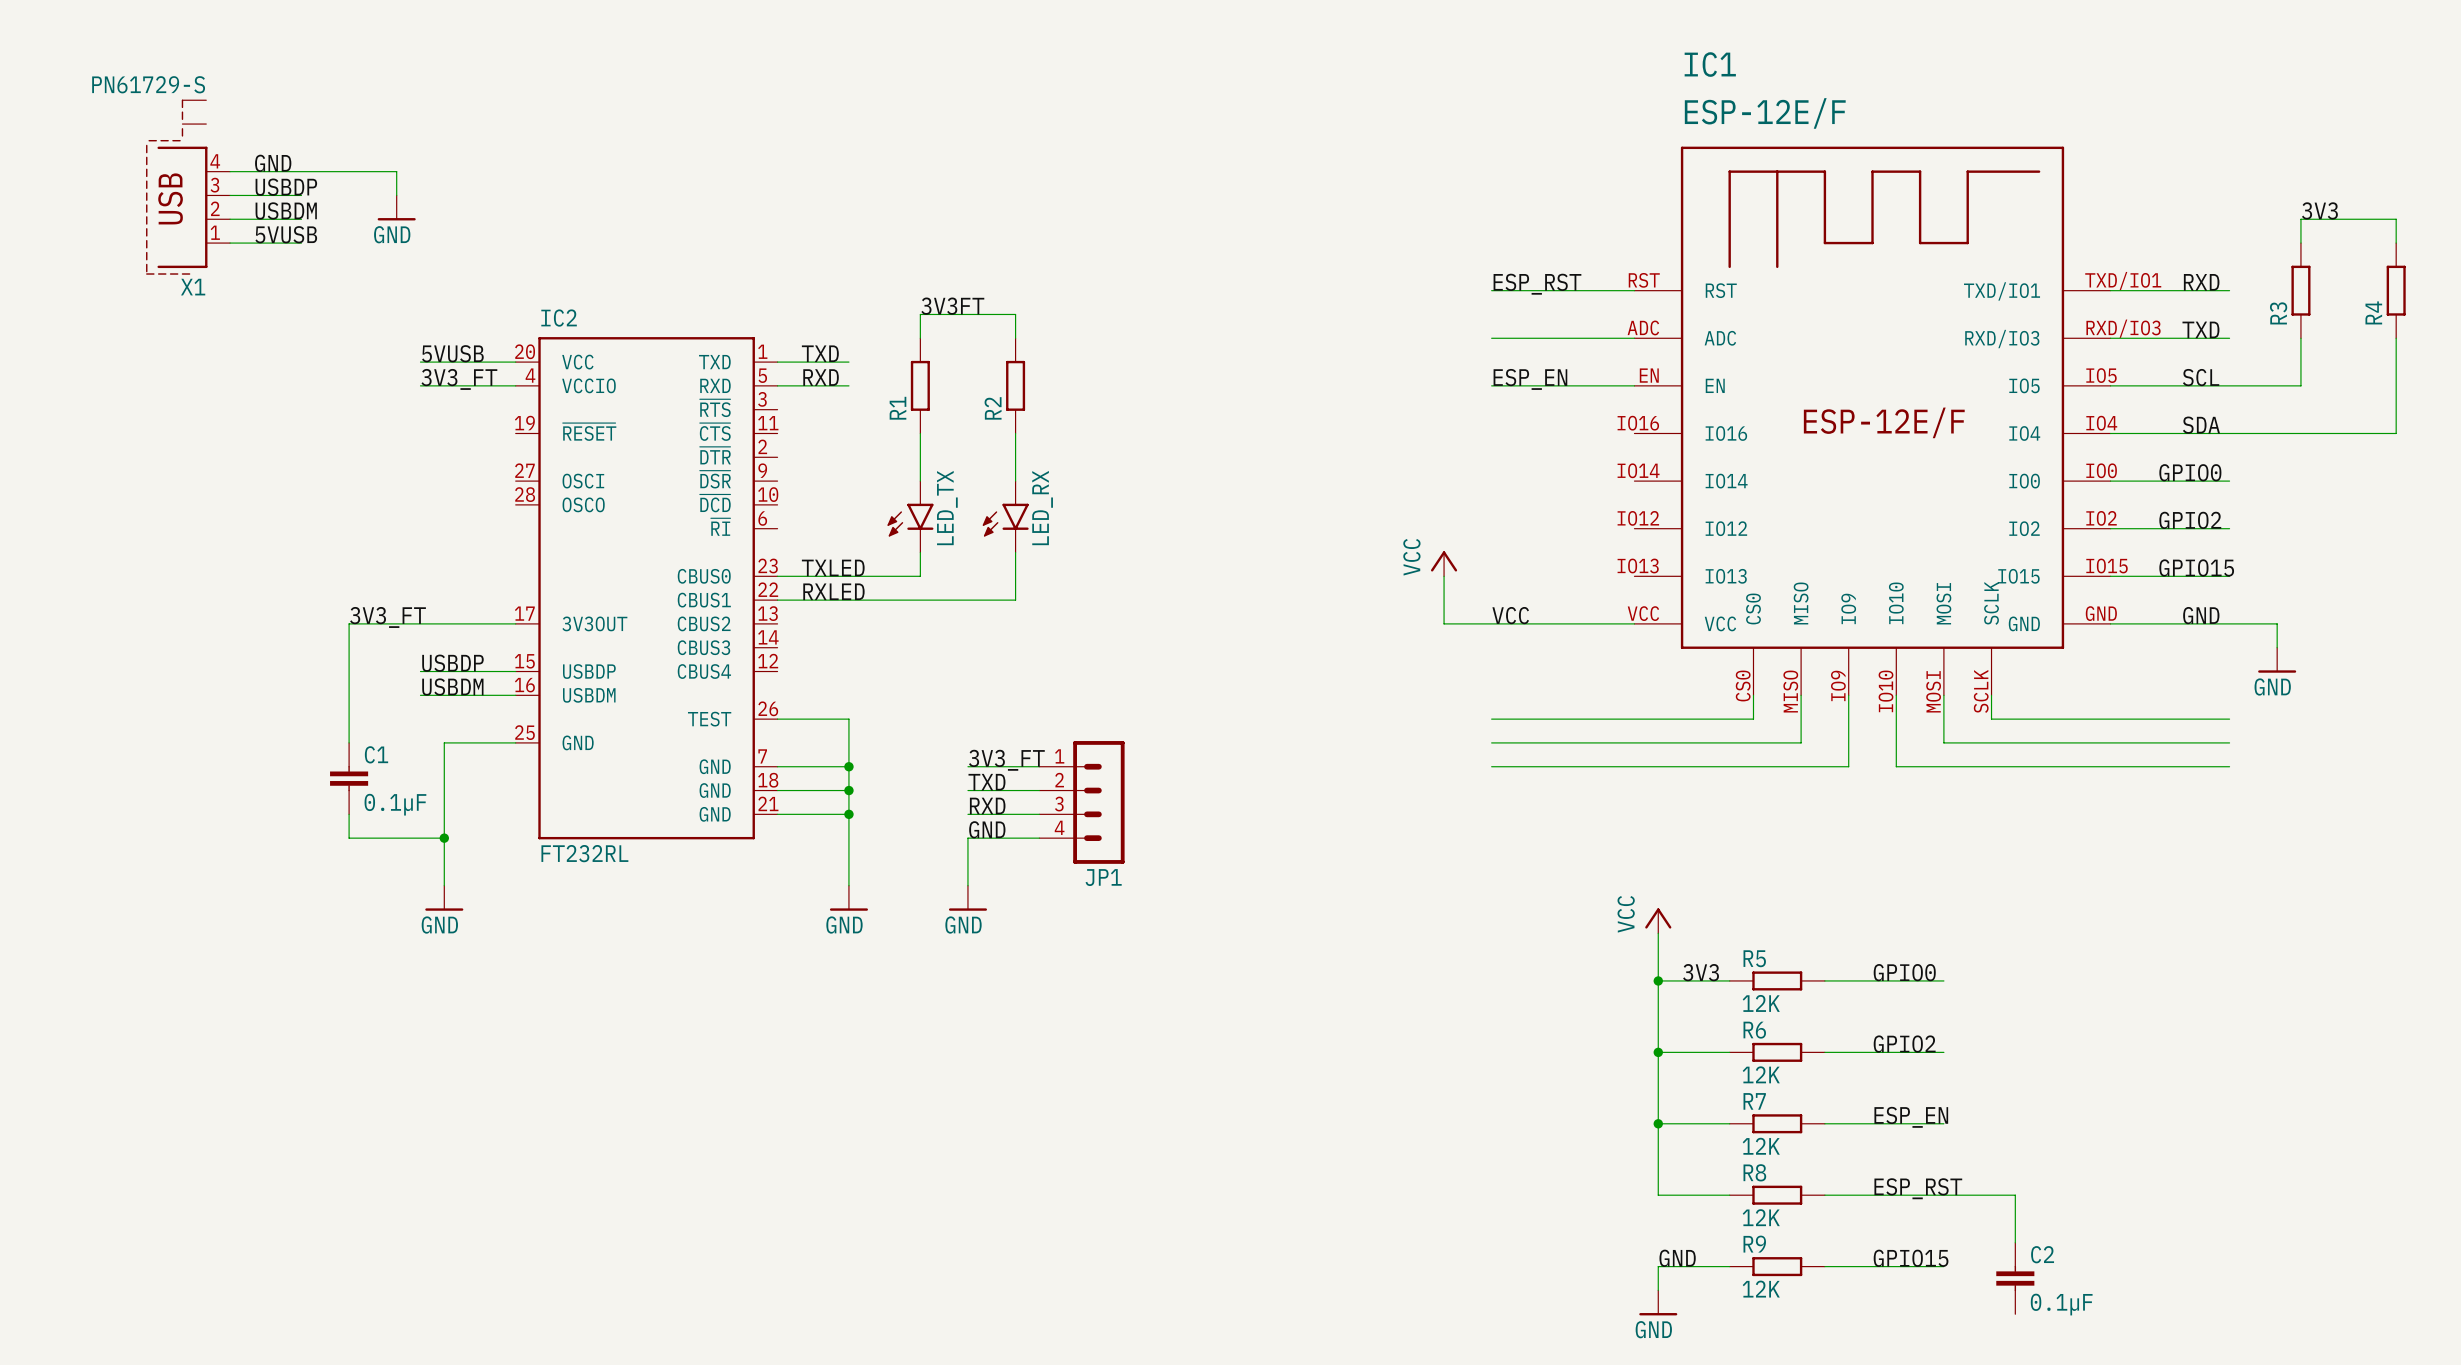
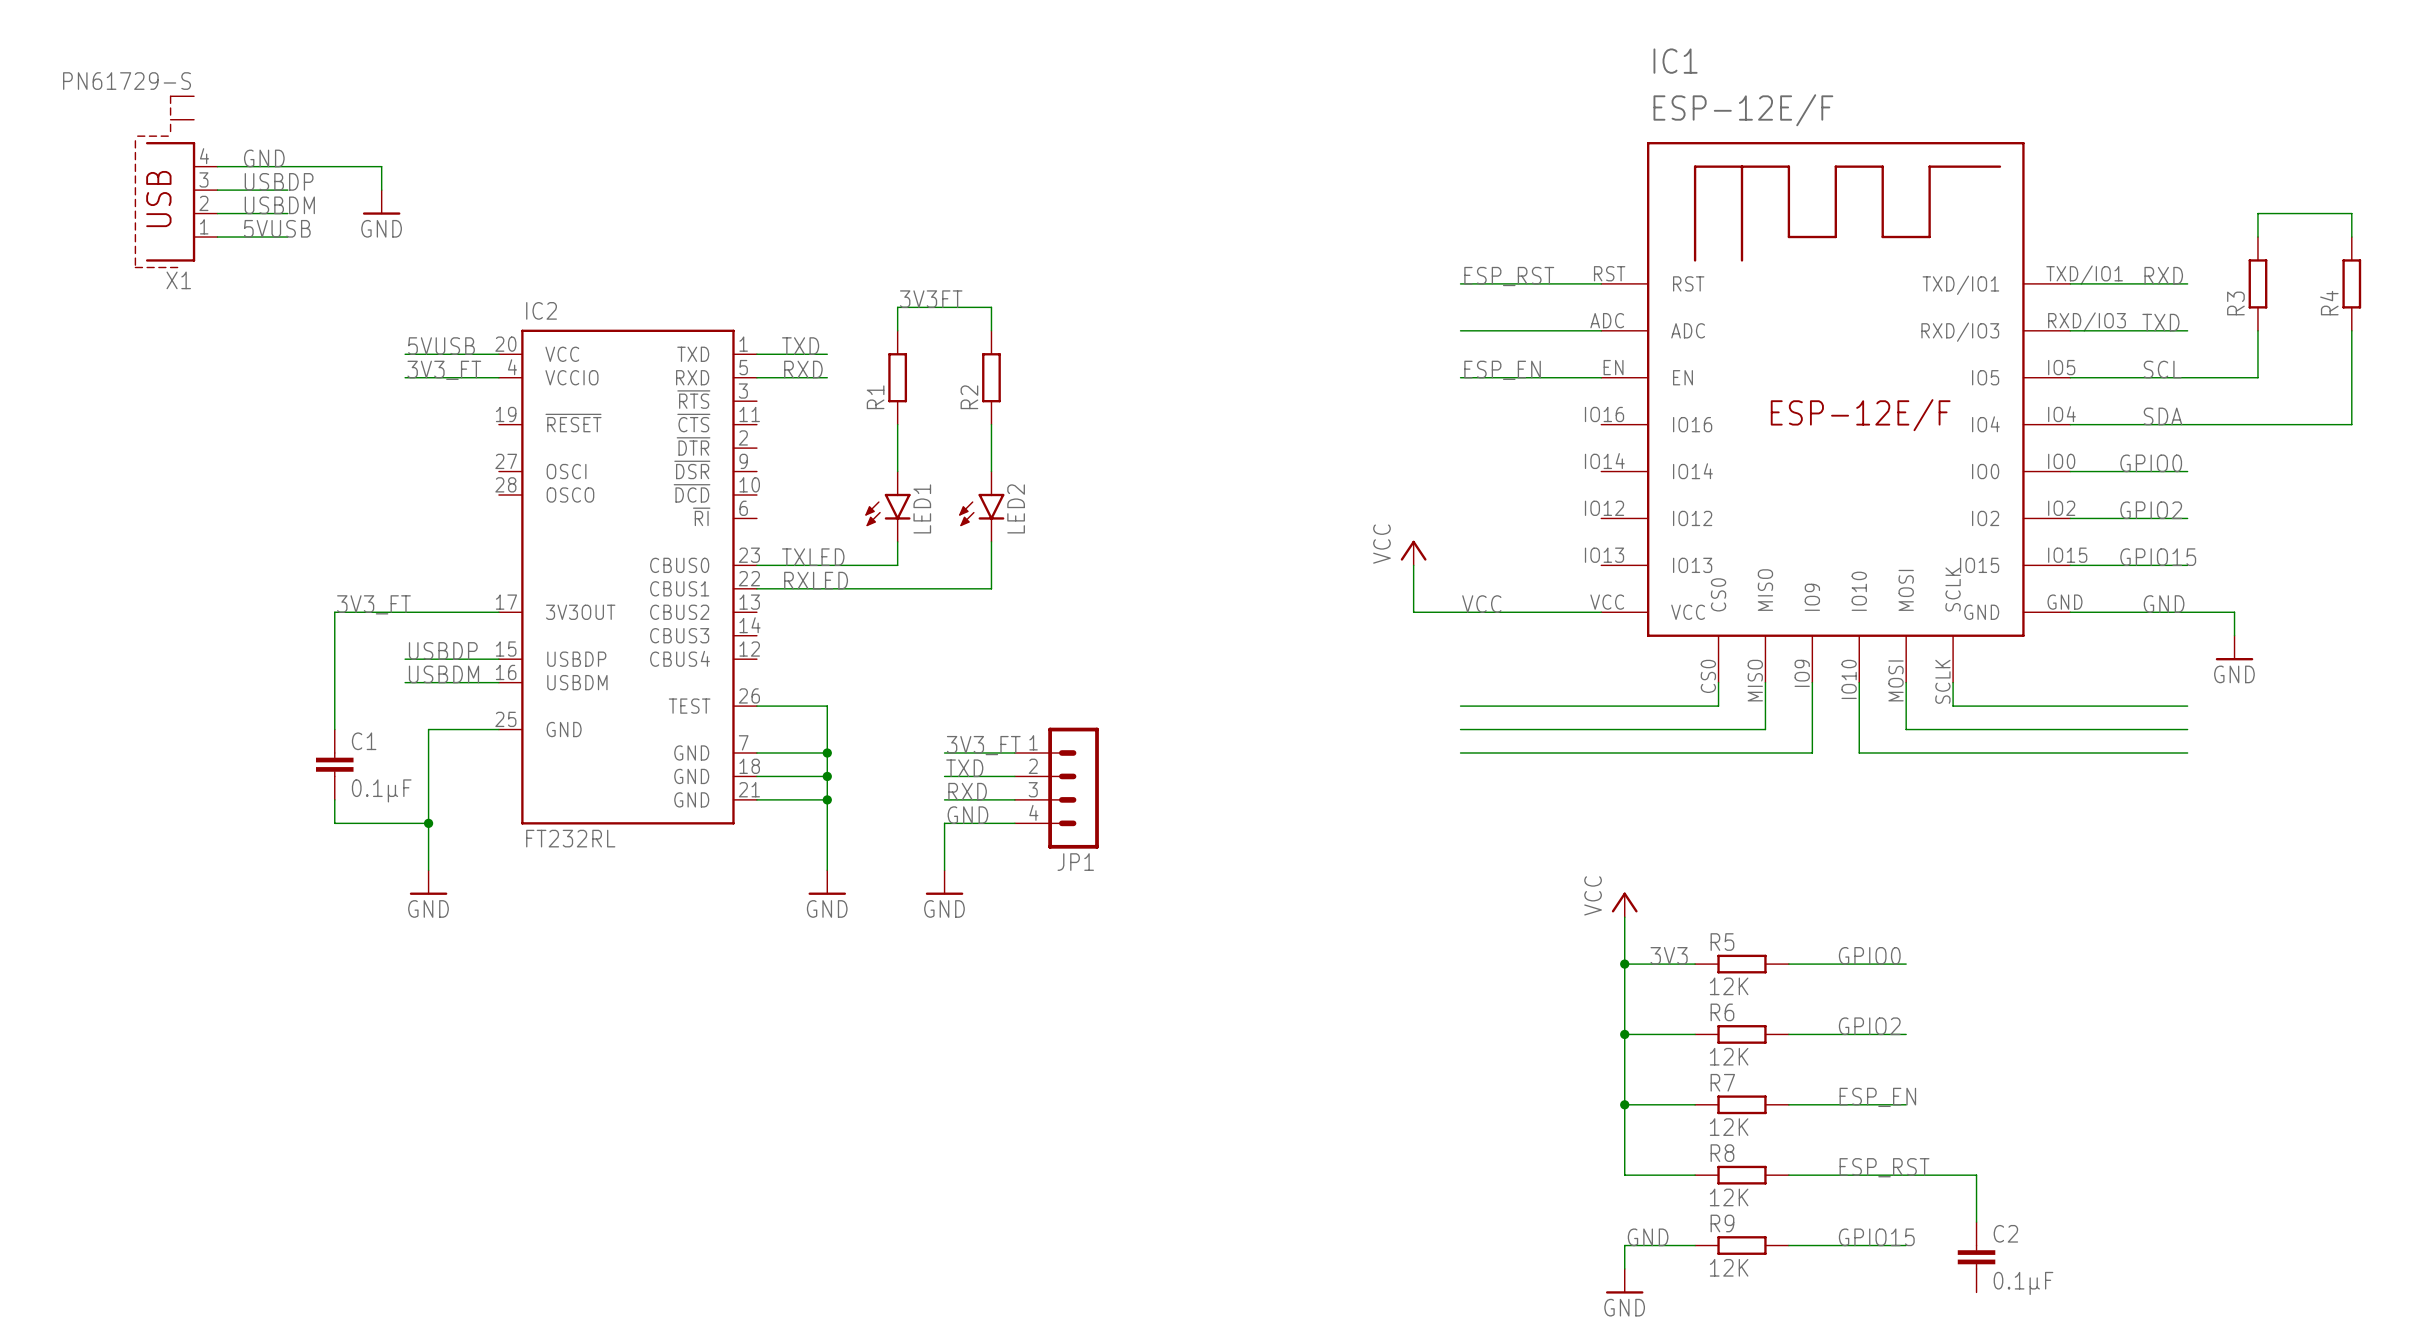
label: 3V3 (2319, 210) -> none
LED_TX name: LED_TX (947, 508) -> LED1 (922, 508)
LED_RX name: LED_RX (1042, 508) -> LED2 (1016, 508)

